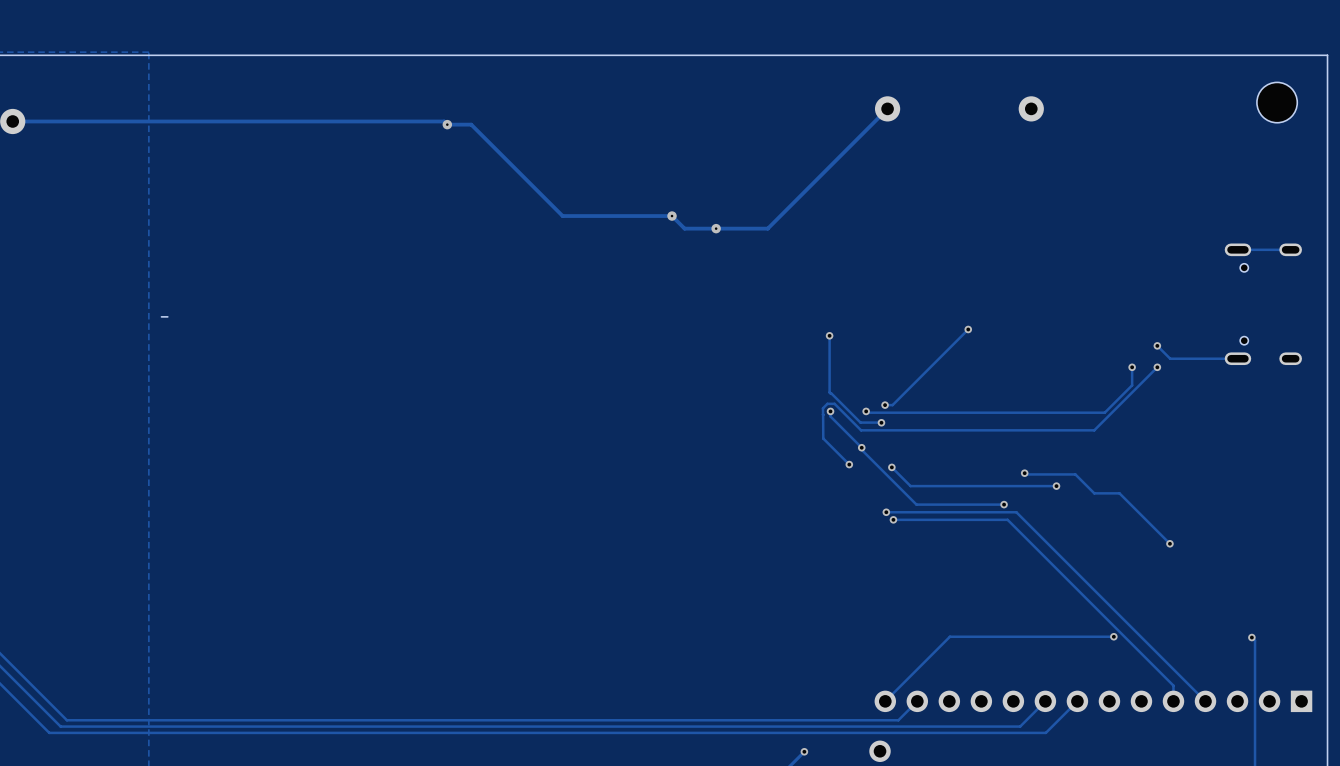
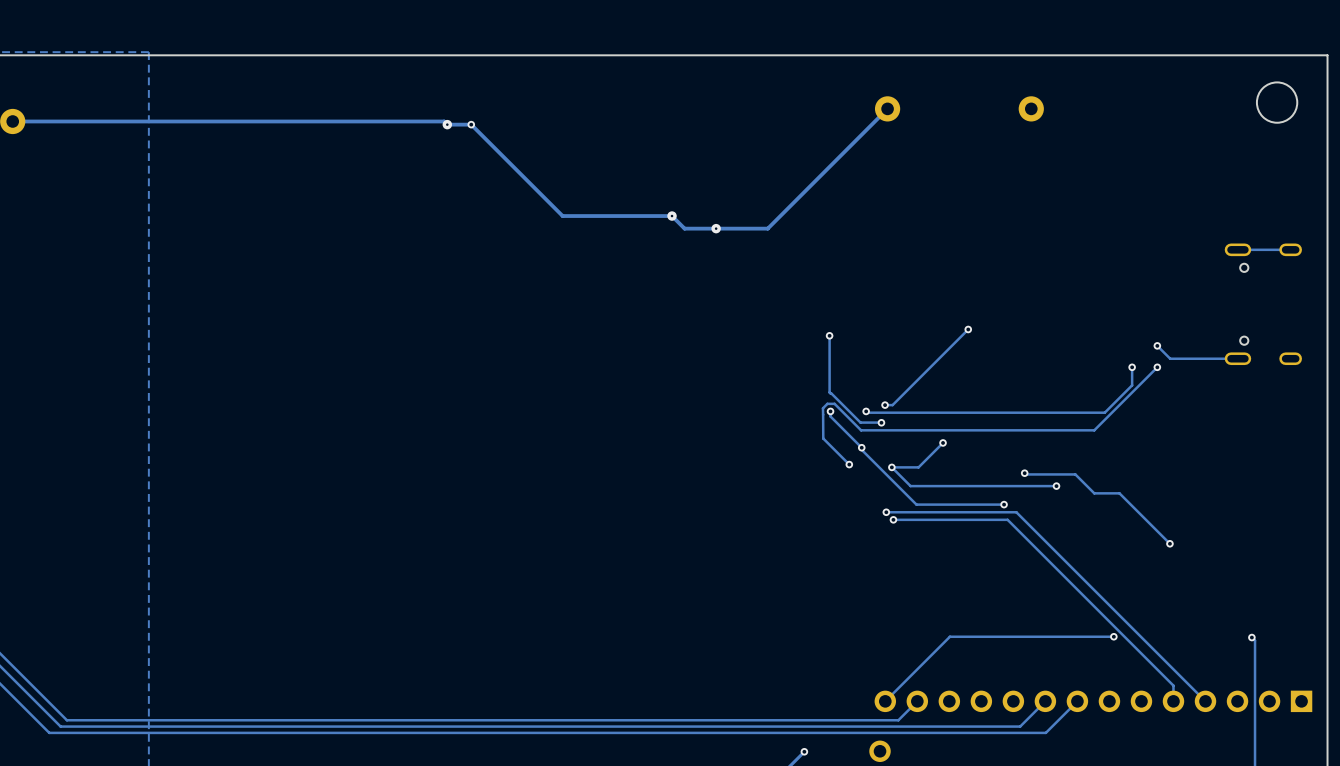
via: none -> (471, 124)
board edge: (167, 316) (161, 316) -> none
track: none -> (943, 442) (918, 467) (891, 467)
via: none -> (943, 442)

